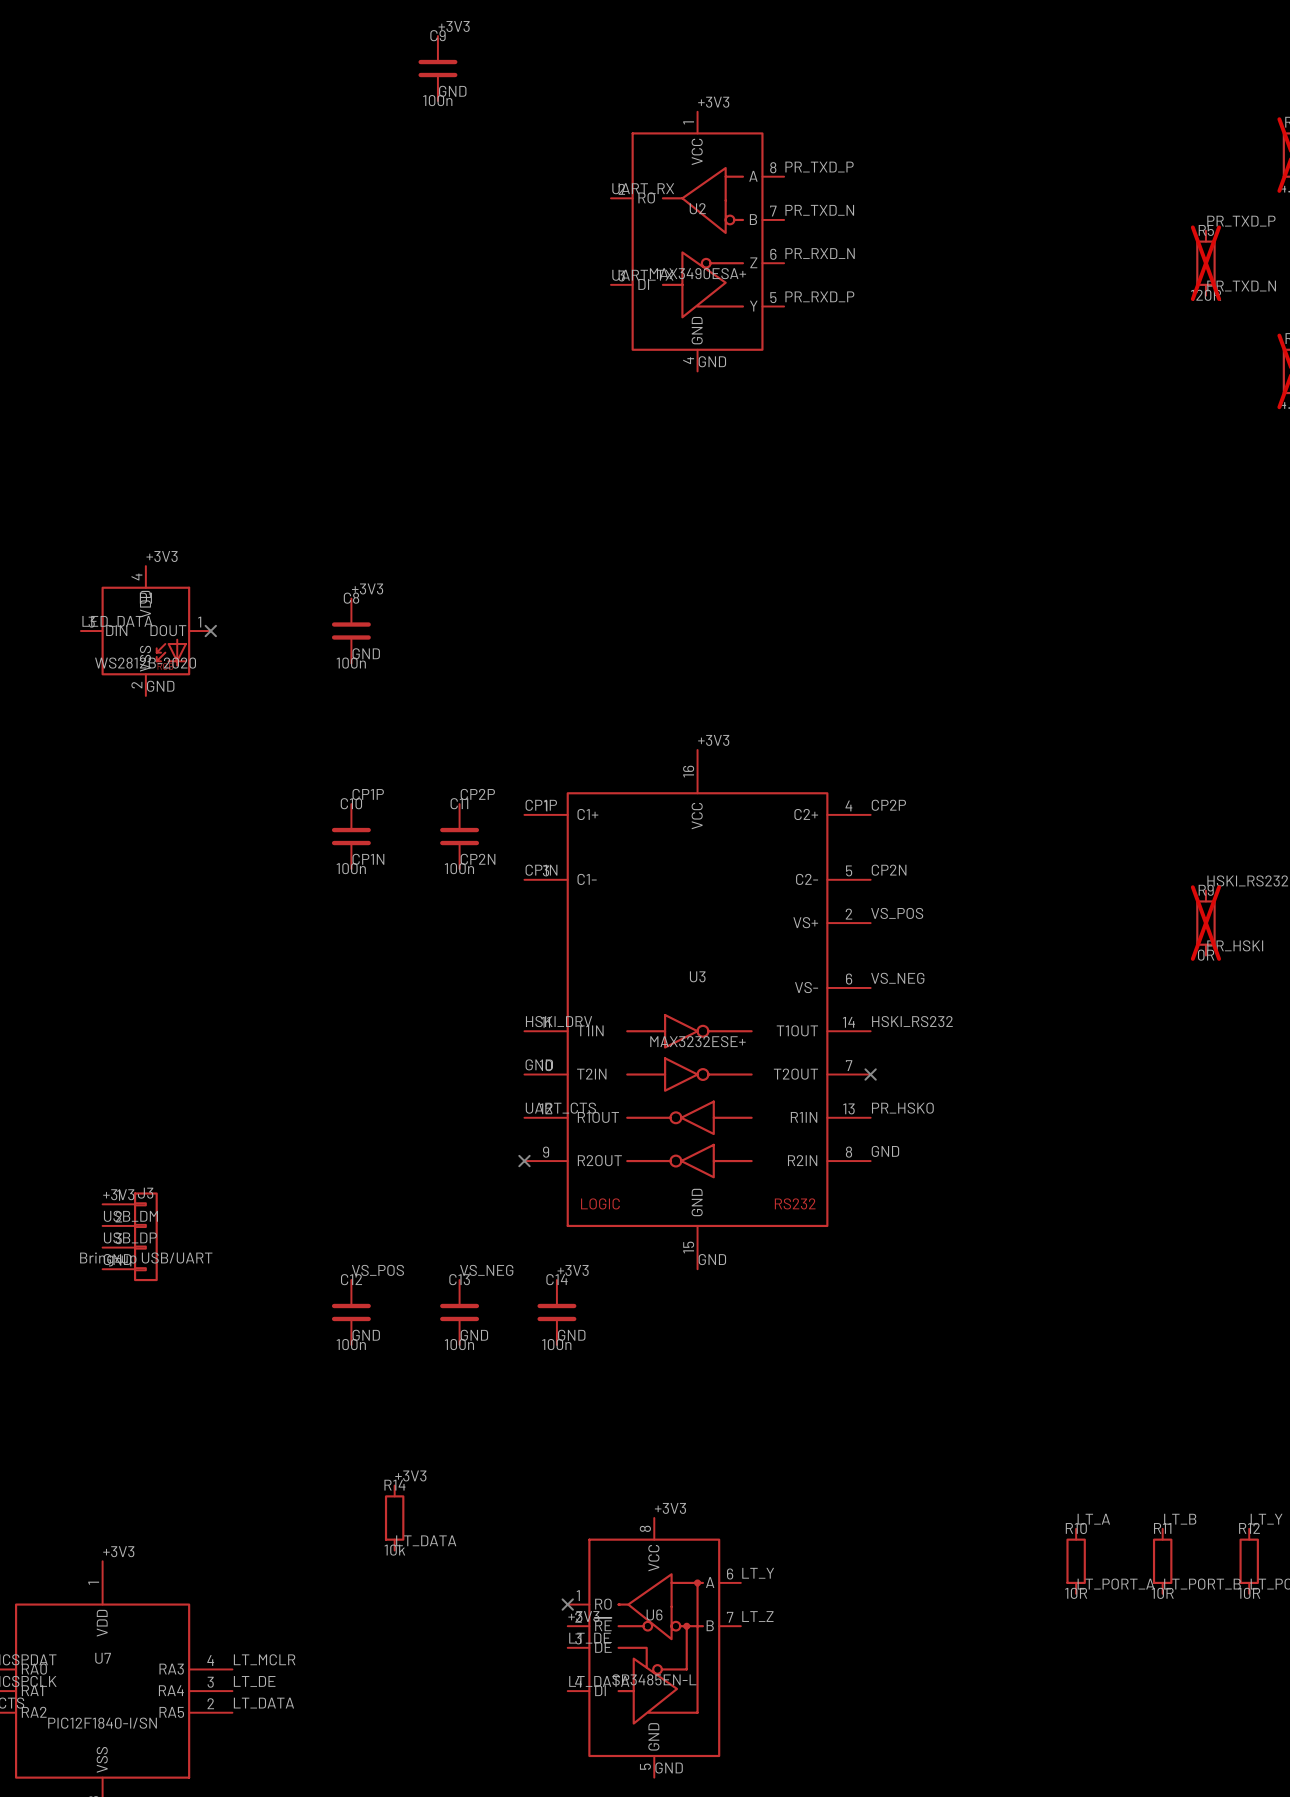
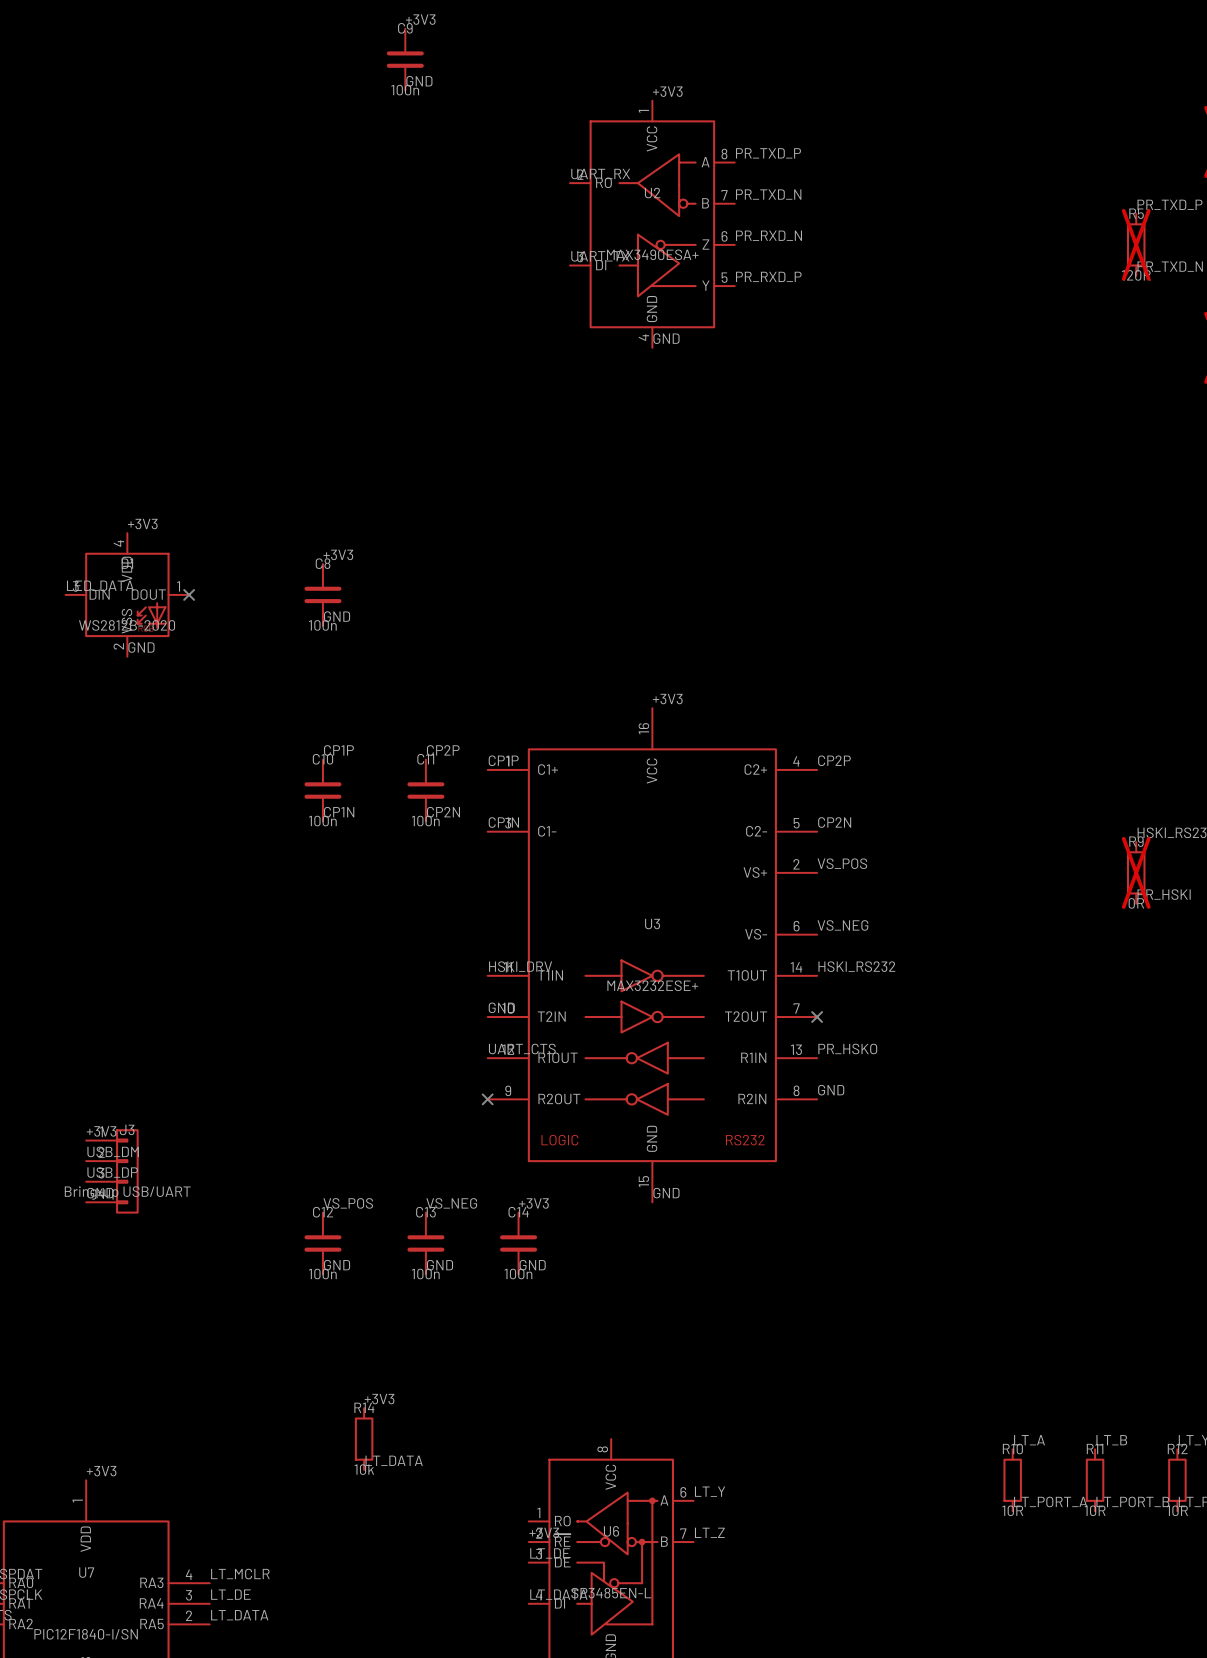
label: +3V3 (670, 1508) -> none
no-connect mark: (567, 1604) -> none

